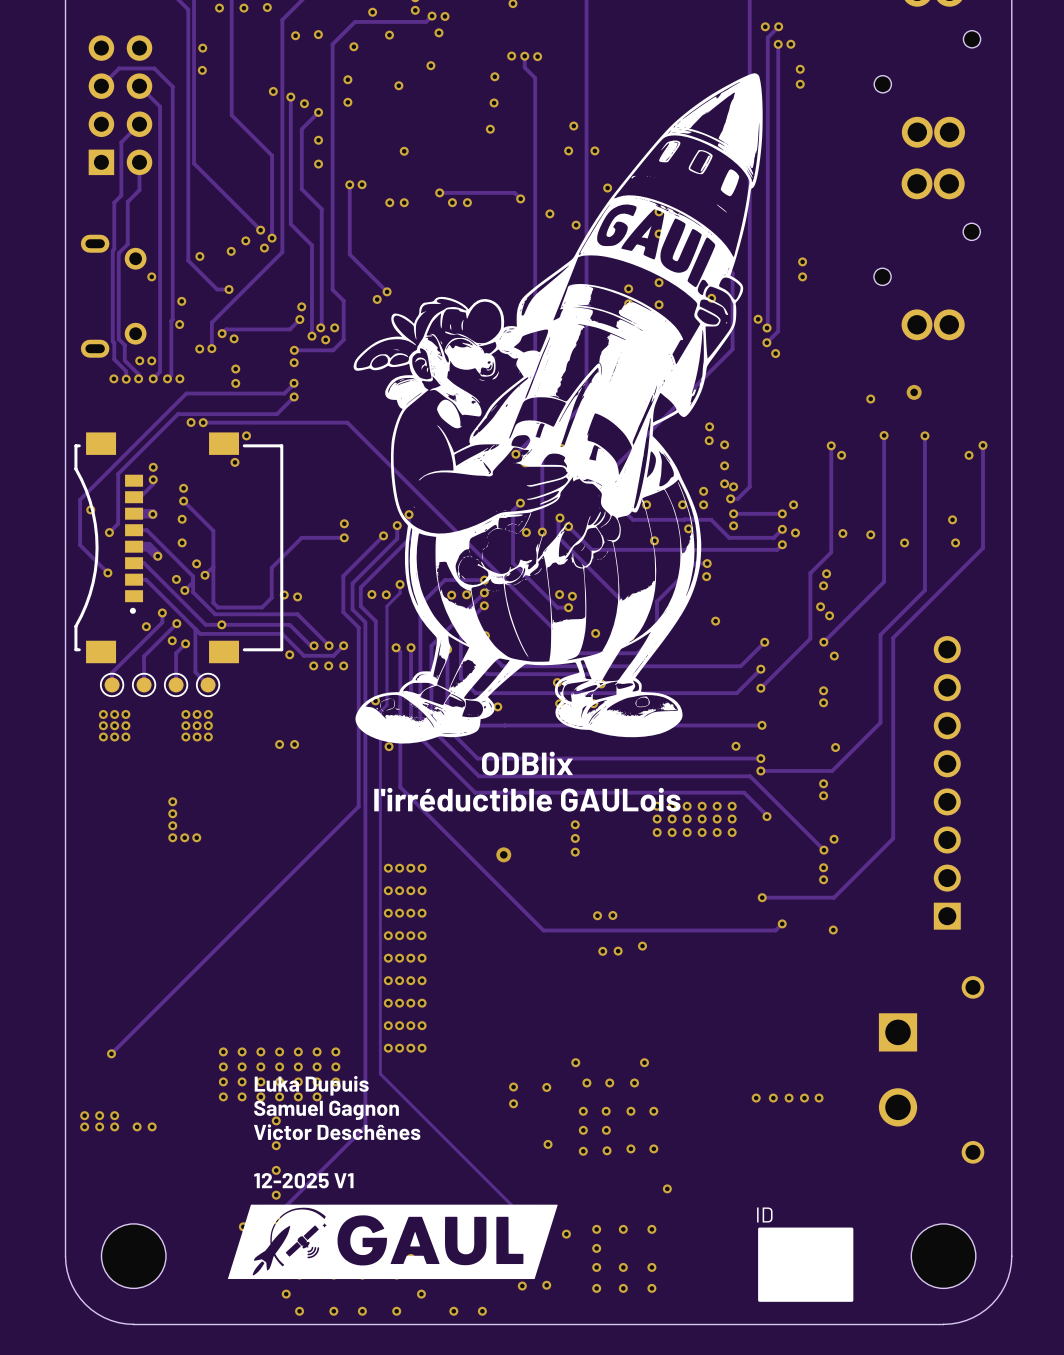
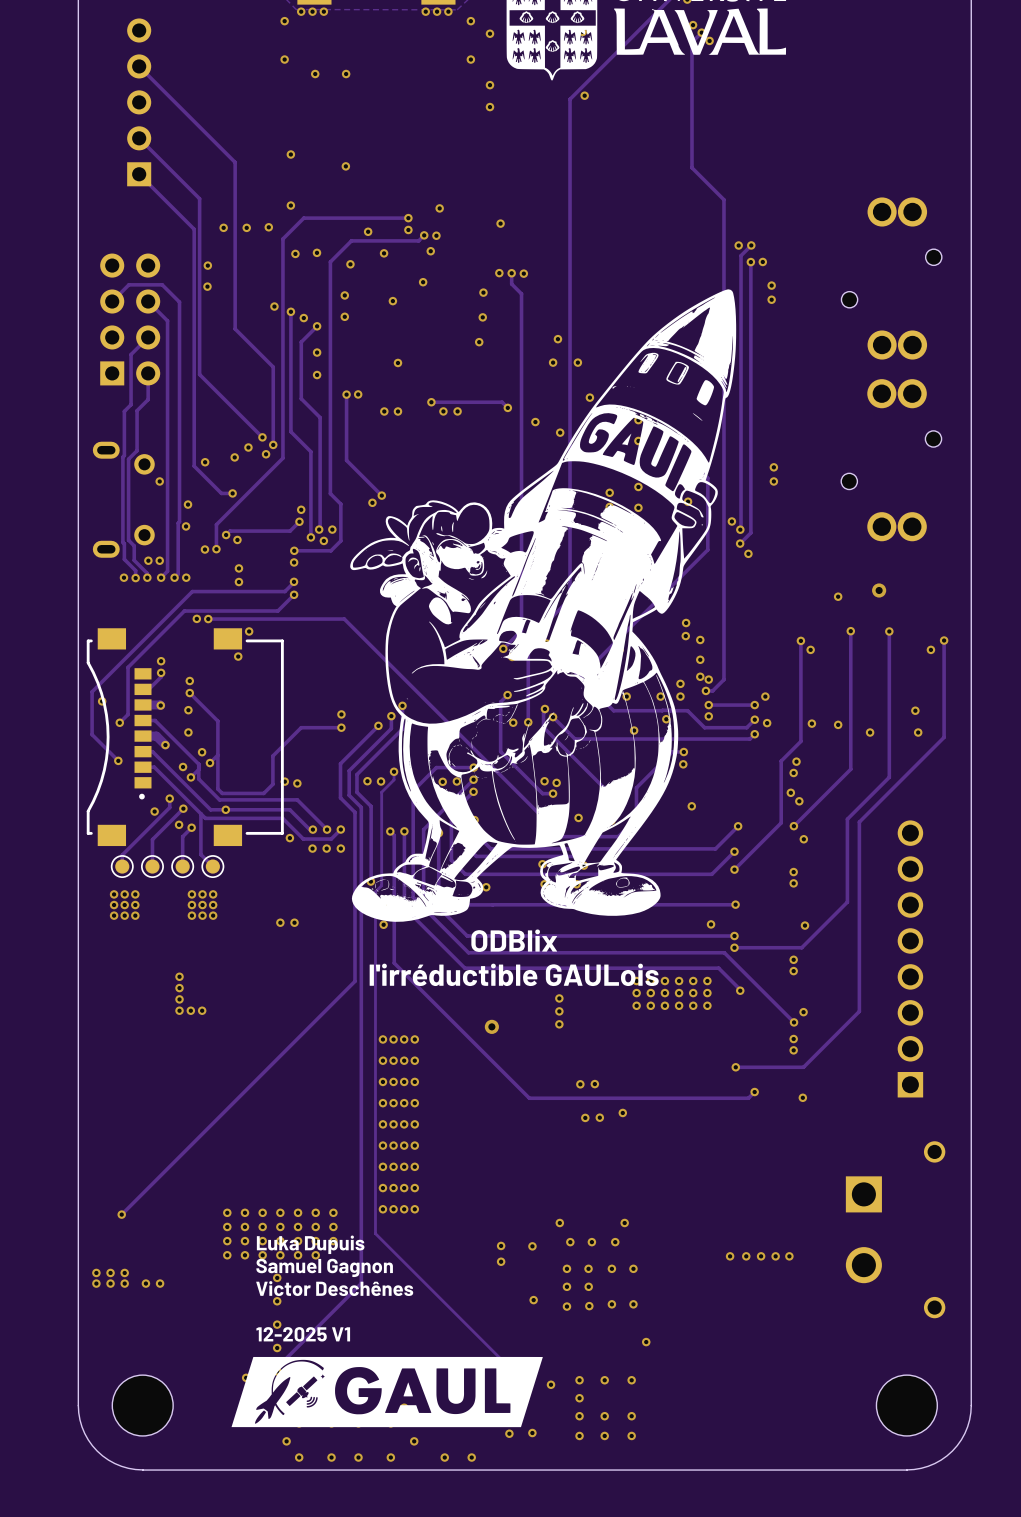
text: ID (764, 1214) -> none
drawing: [758, 1227, 854, 1302] -> none

